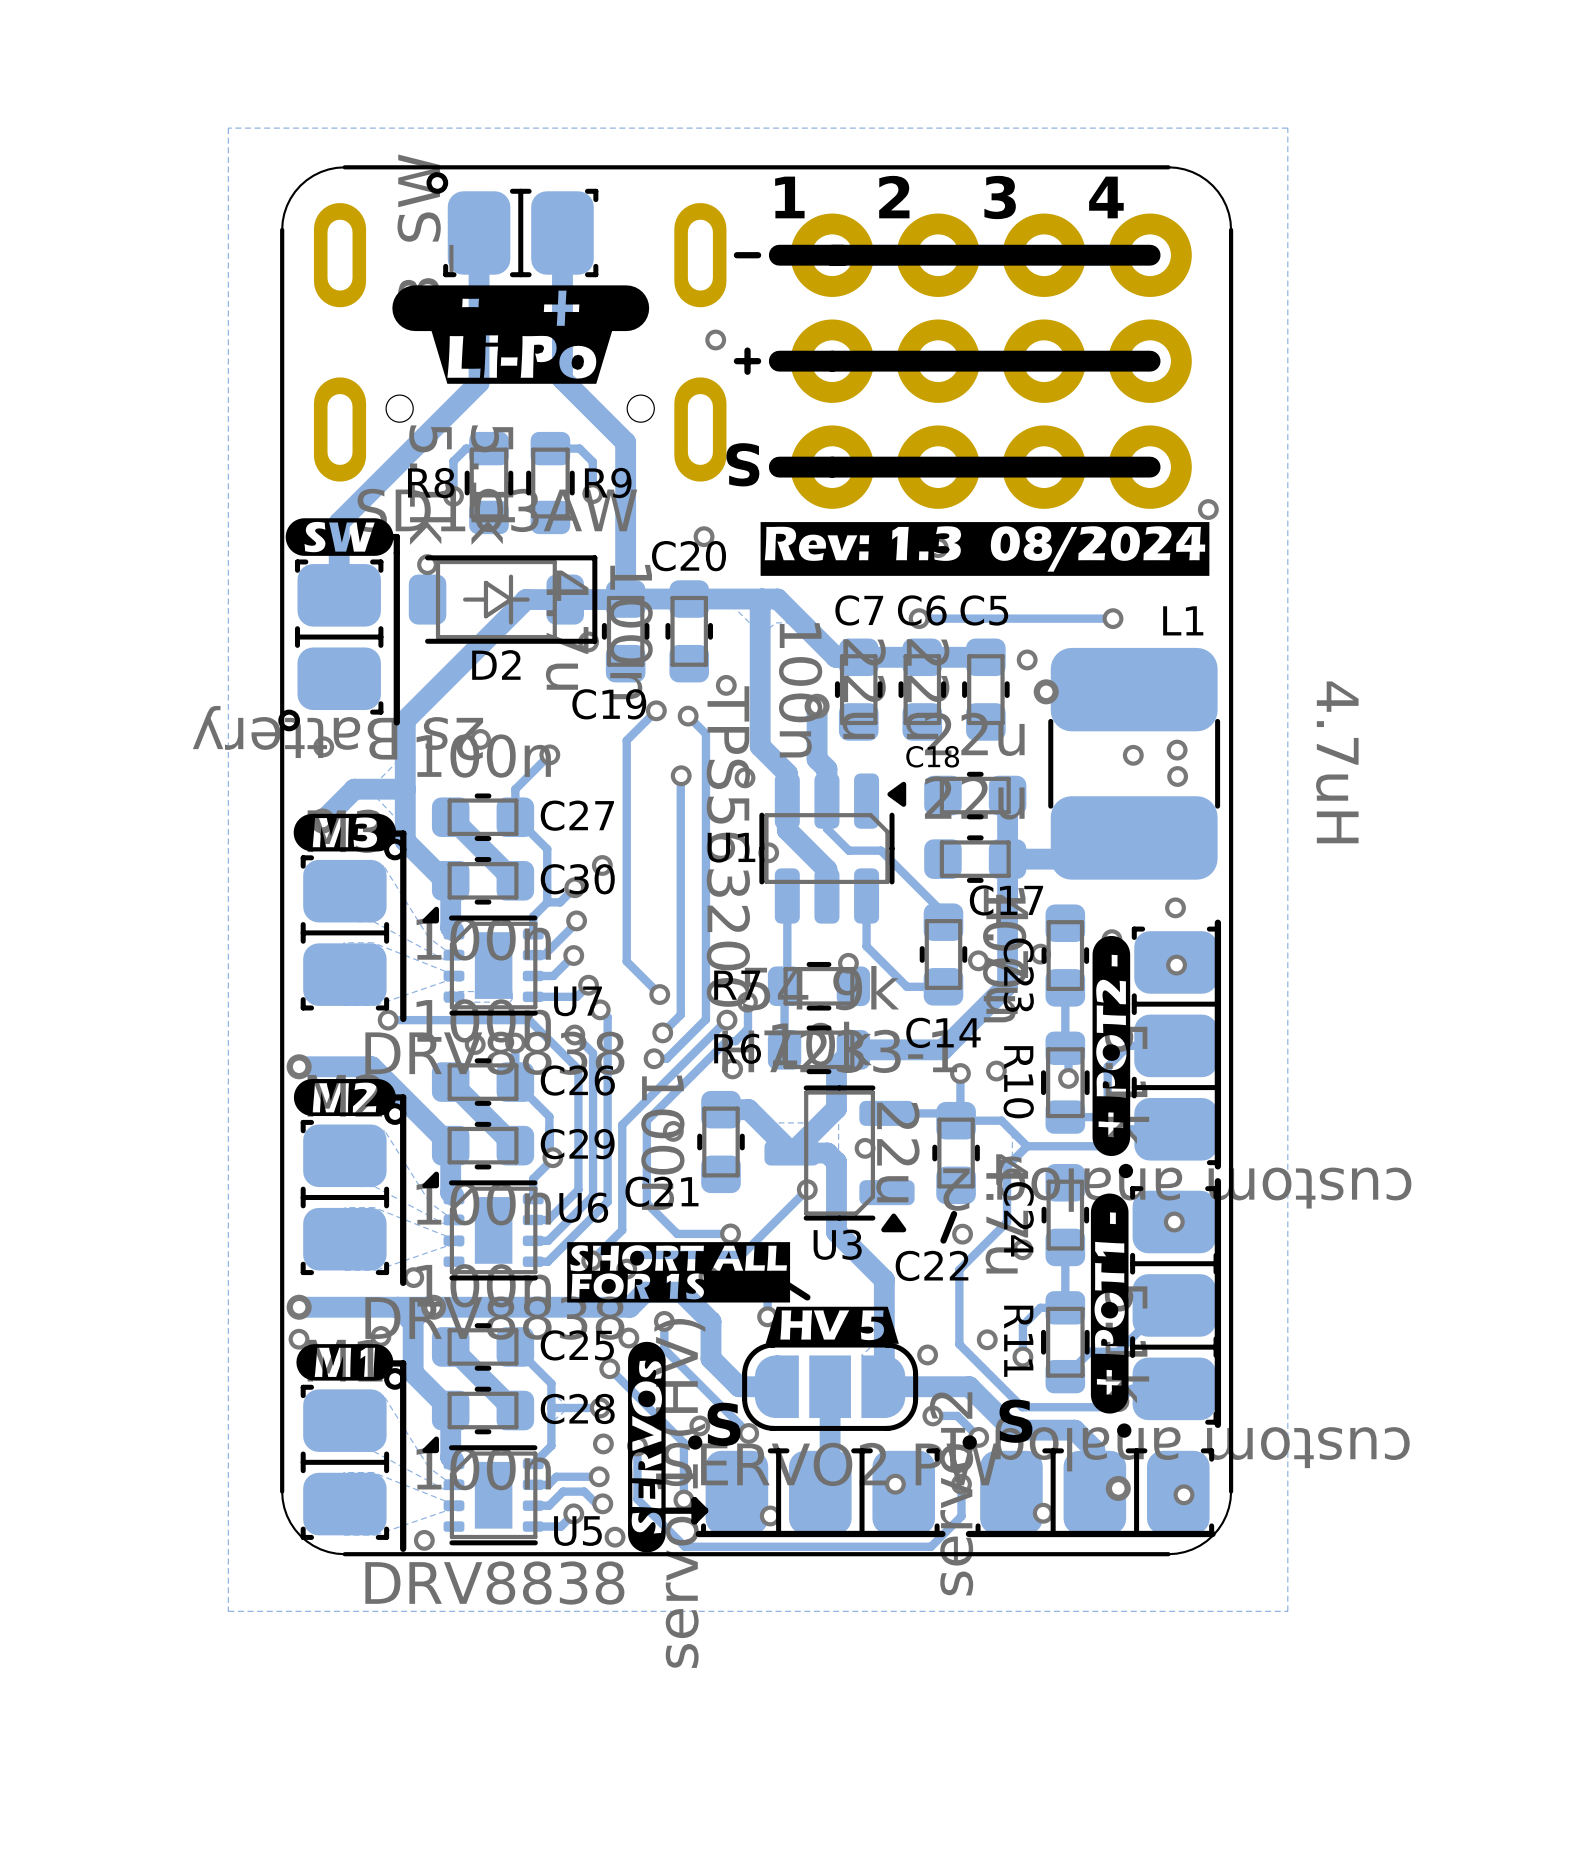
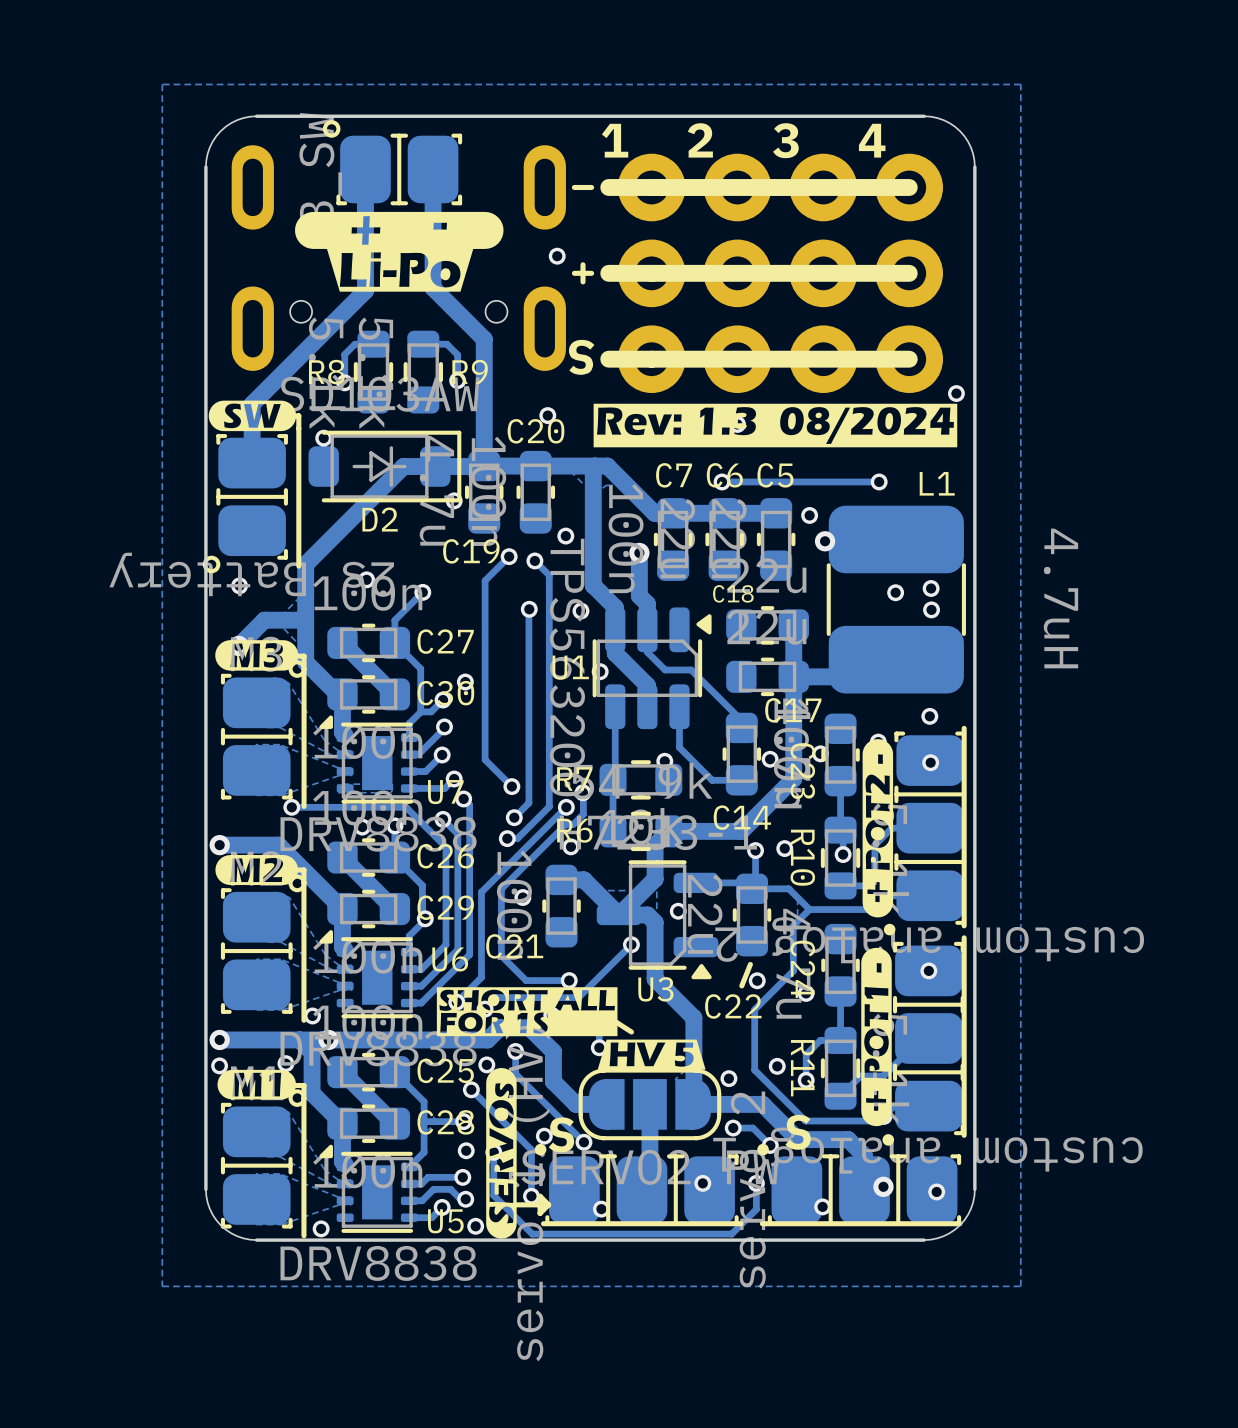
drawing shape: [392, 285, 650, 332] -> [294, 211, 504, 249]

